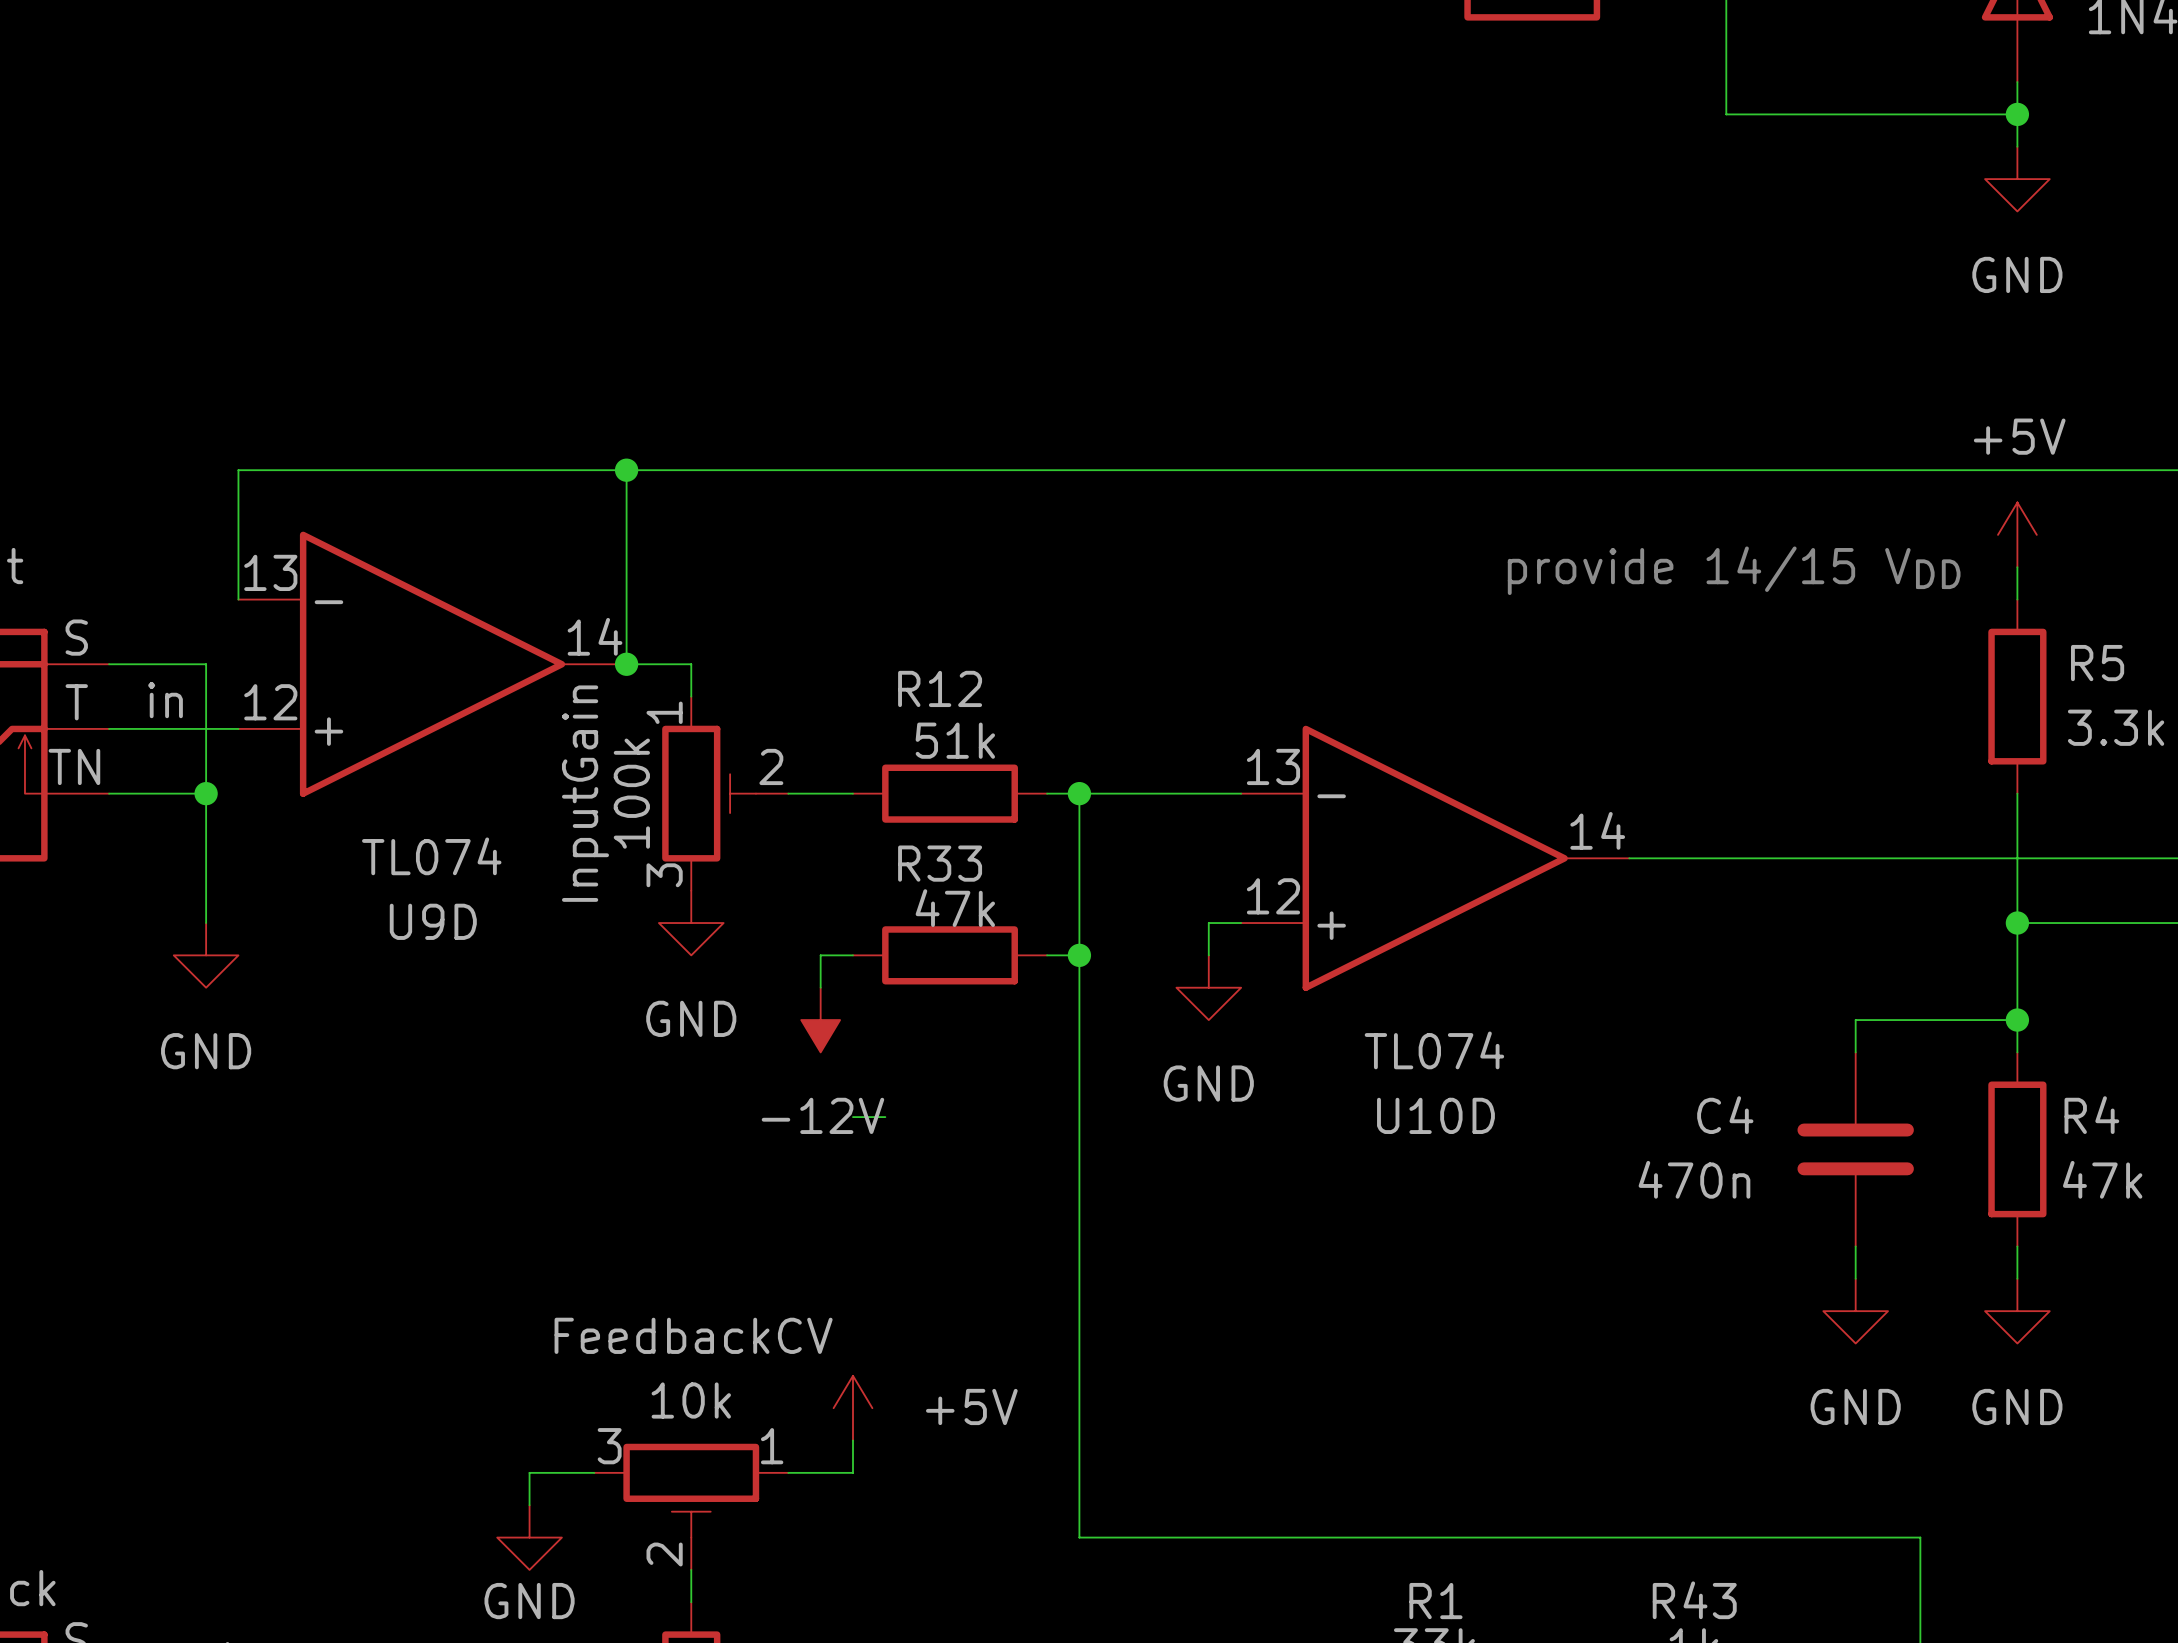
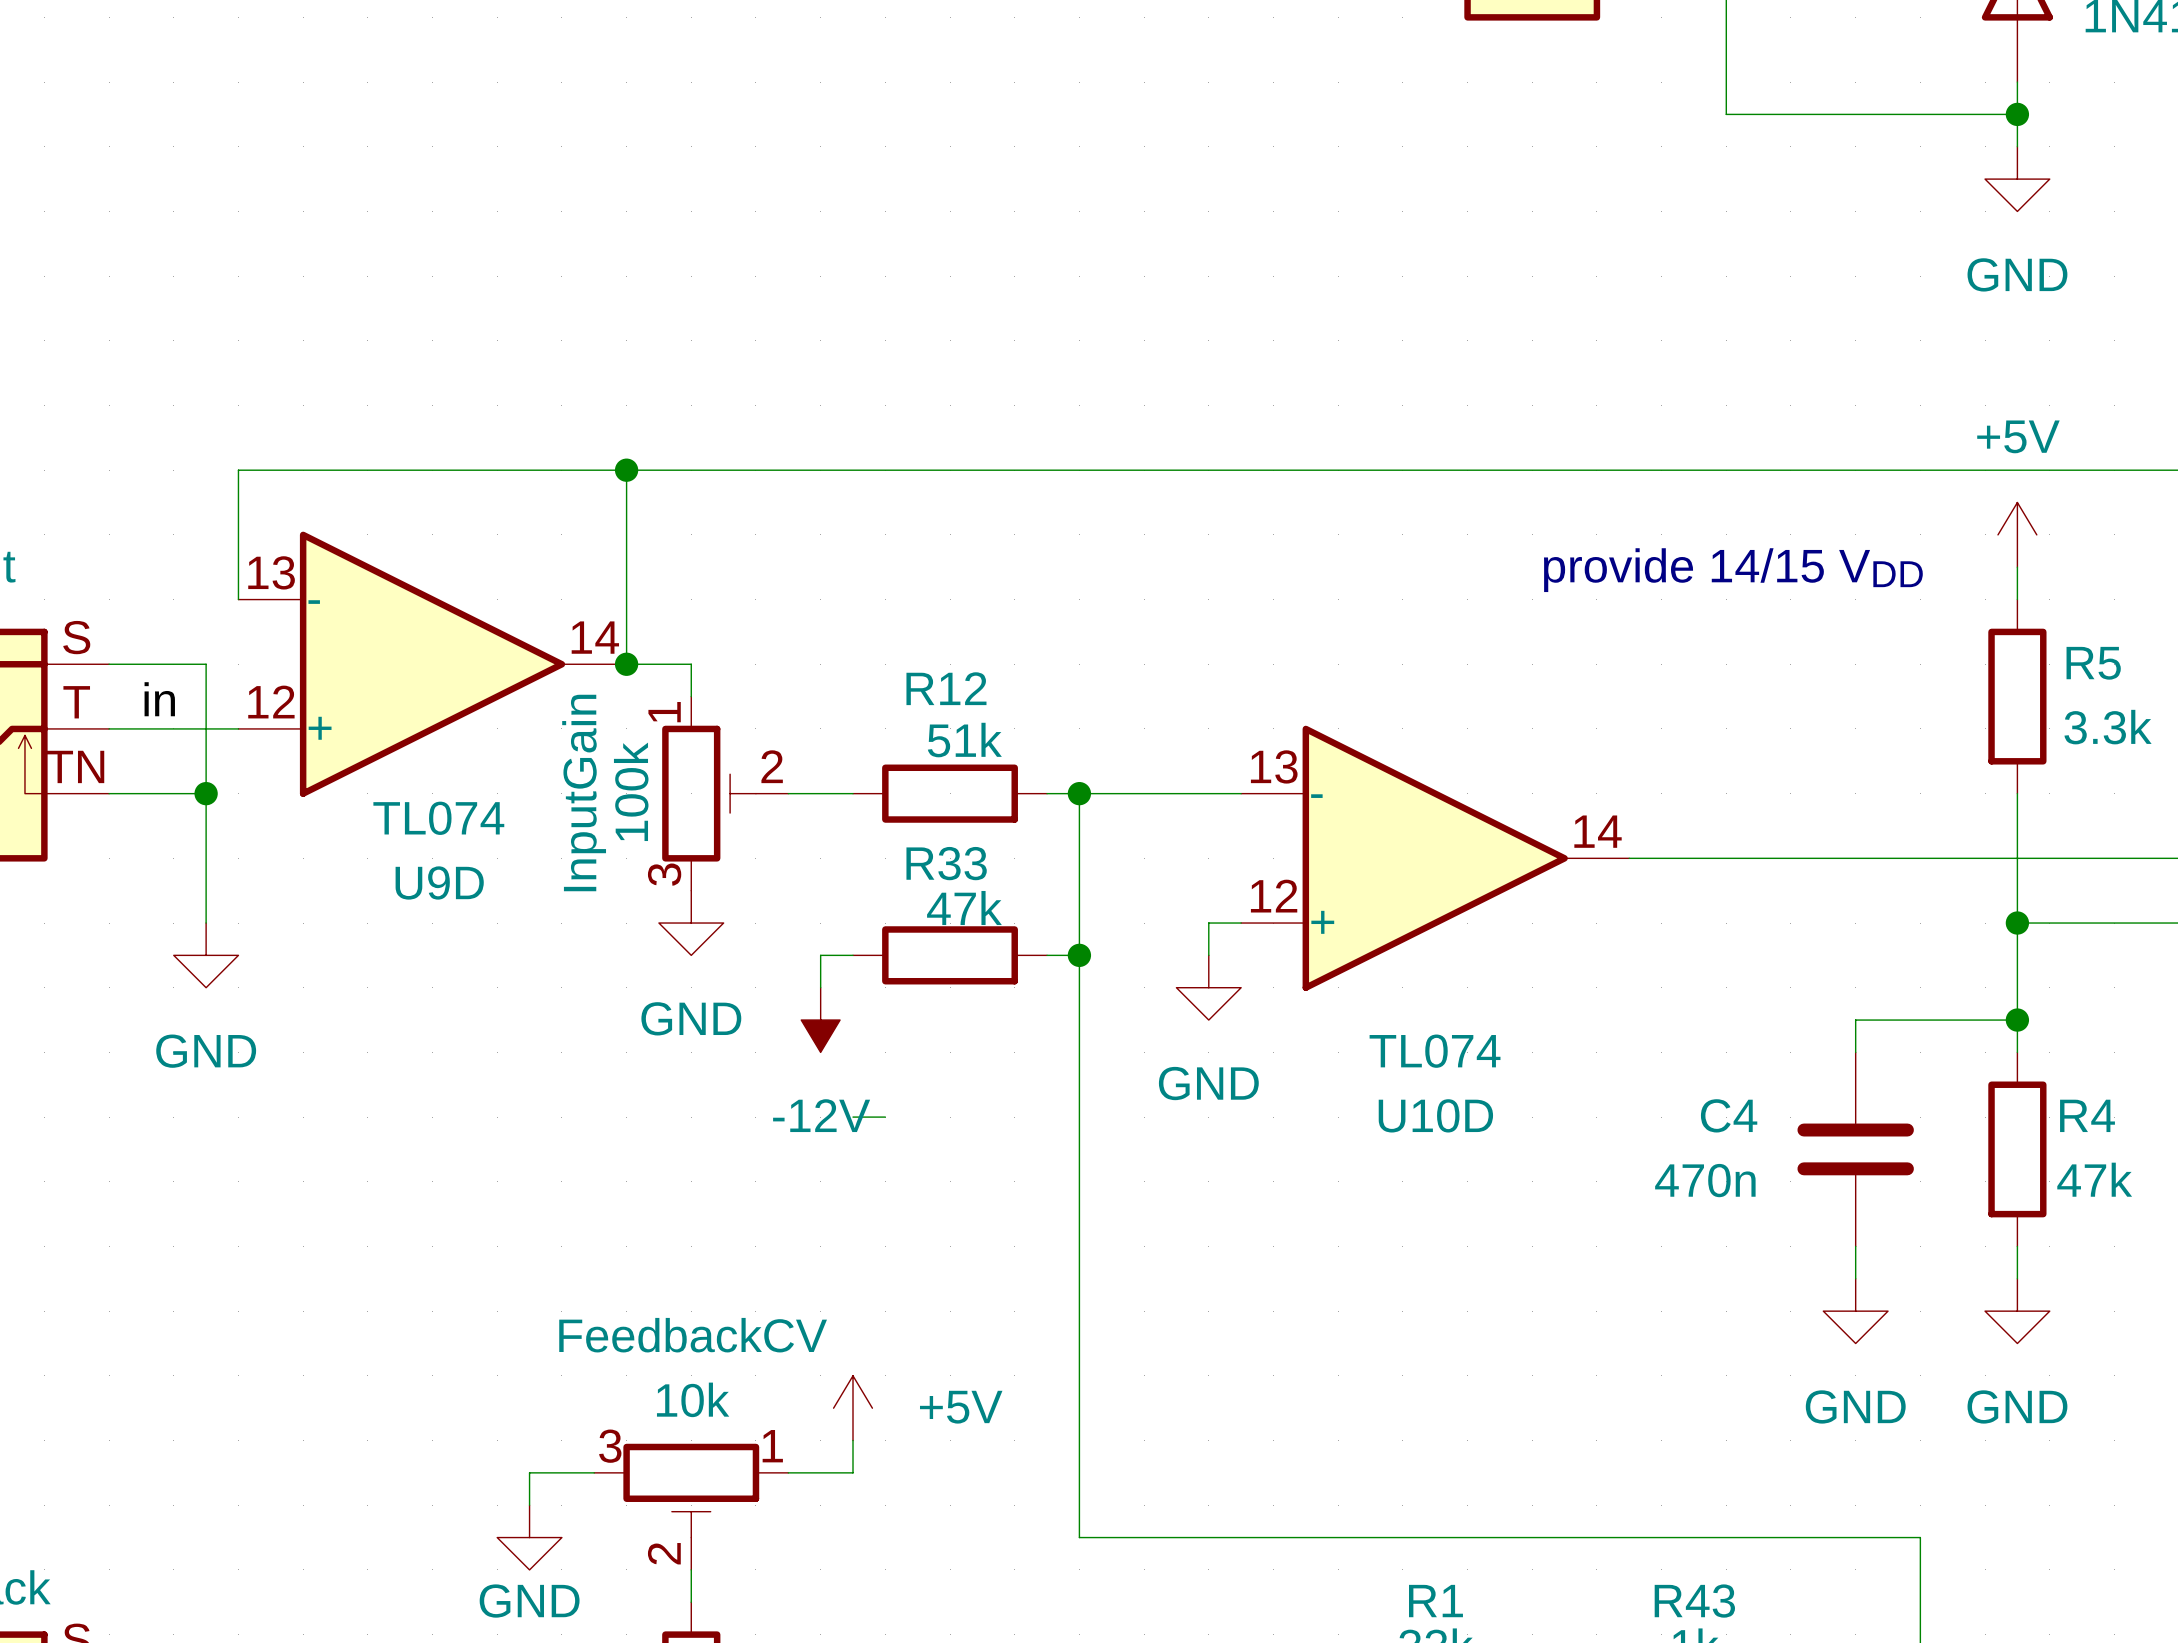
U9D value position: TL074 (431, 856) -> TL074 (438, 818)
U9D name position: U9D (433, 921) -> U9D (439, 882)

